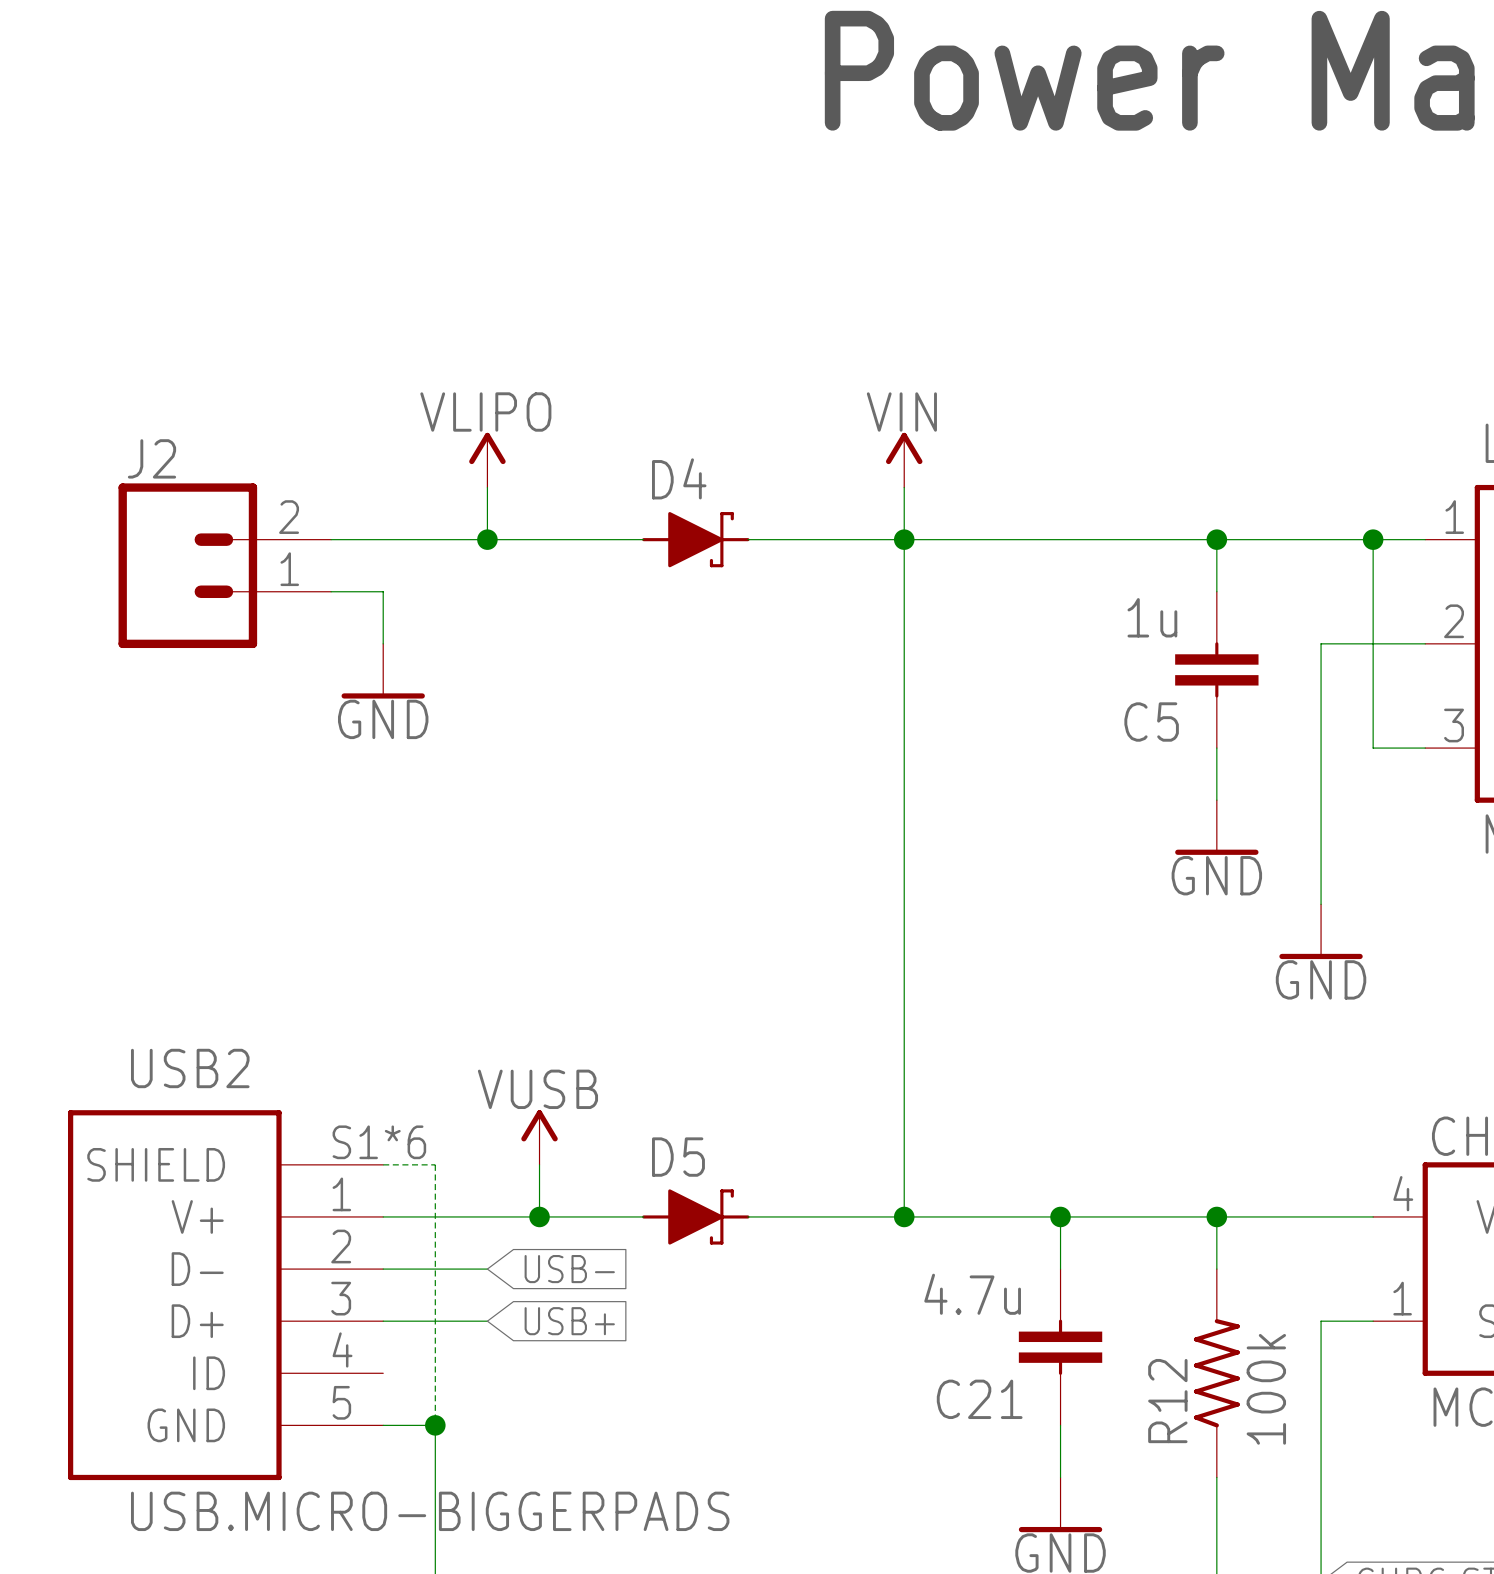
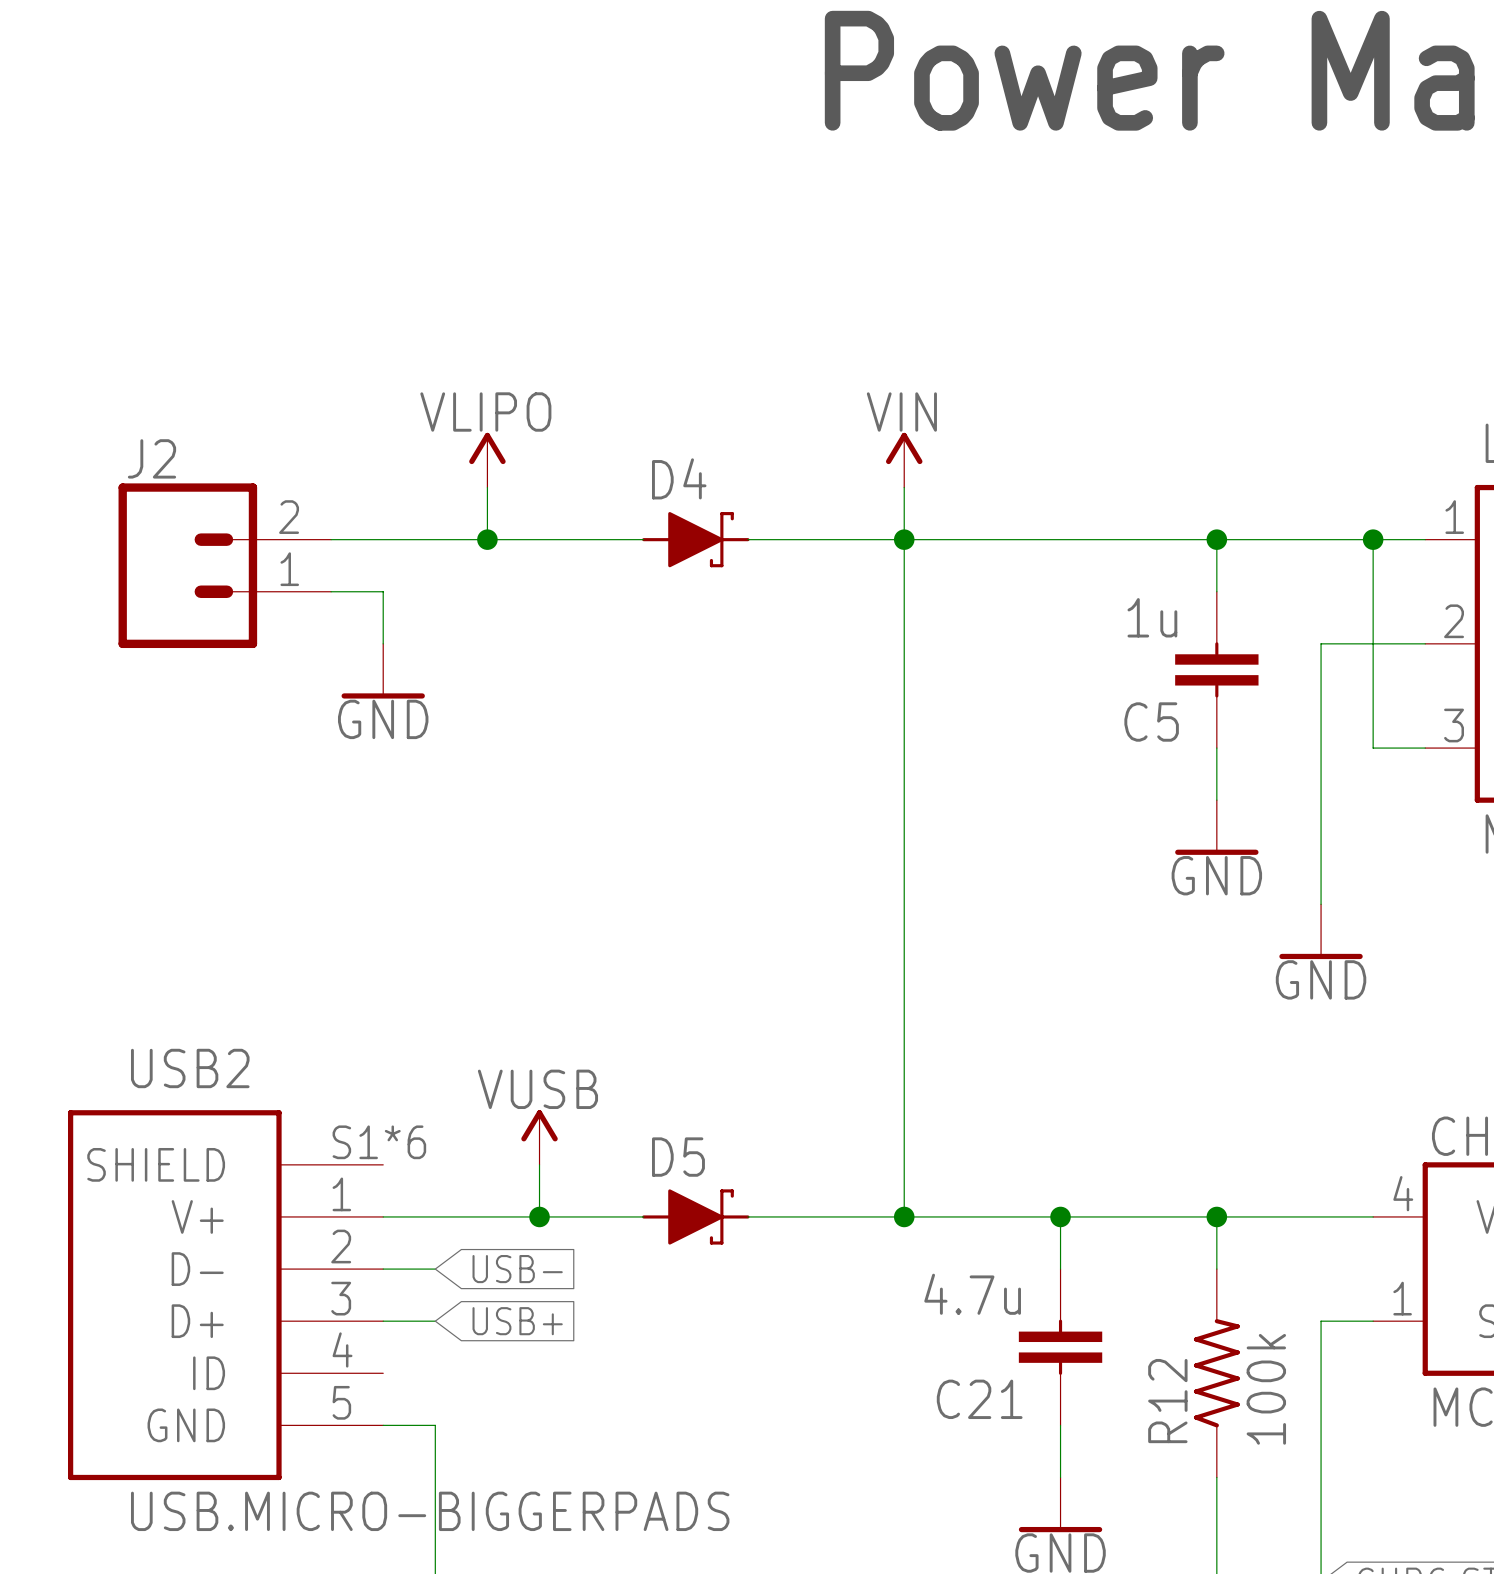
wire: (383, 1164) (435, 1164) (435, 1425) -> none
wire: (435, 1269) (487, 1269) -> none
global label position: USB- (569, 1269) -> USB- (517, 1269)
wire: (435, 1321) (487, 1321) -> none
global label position: USB+ (569, 1321) -> USB+ (517, 1321)
junction: (435, 1425) -> none

